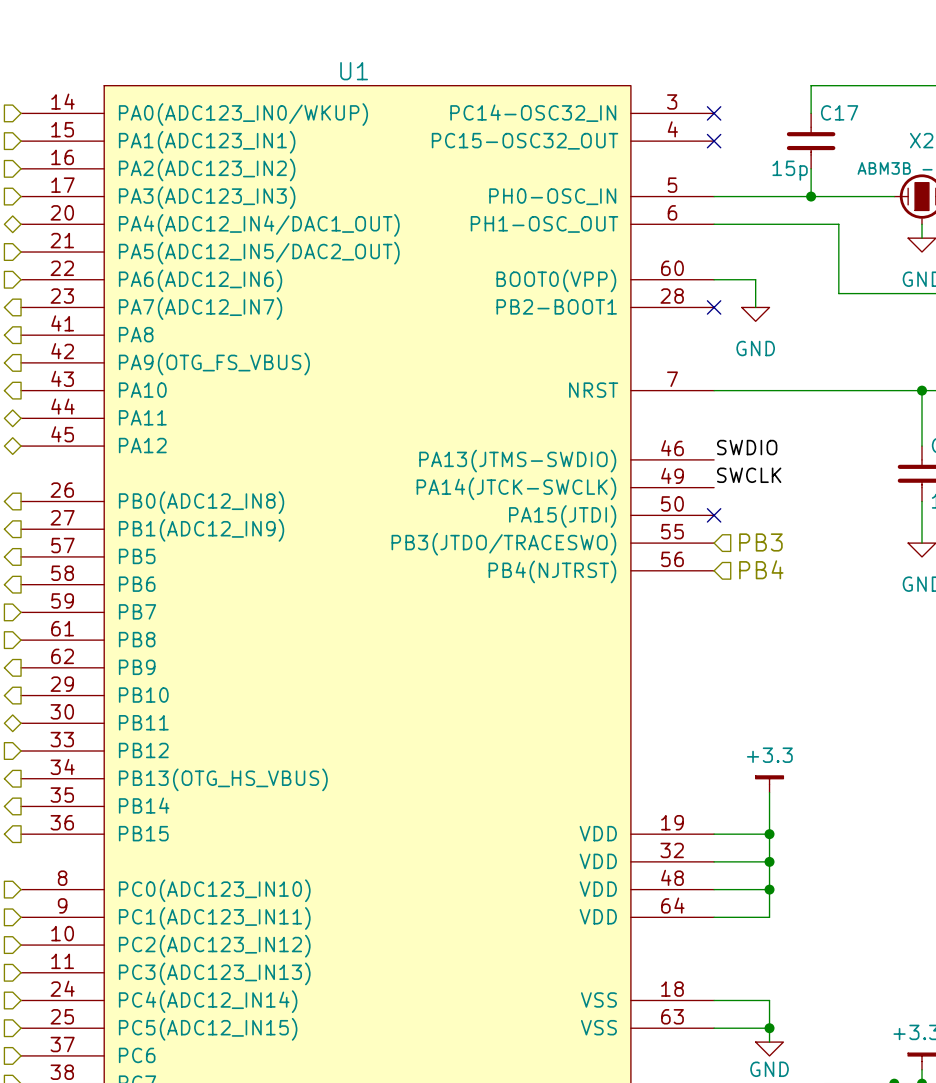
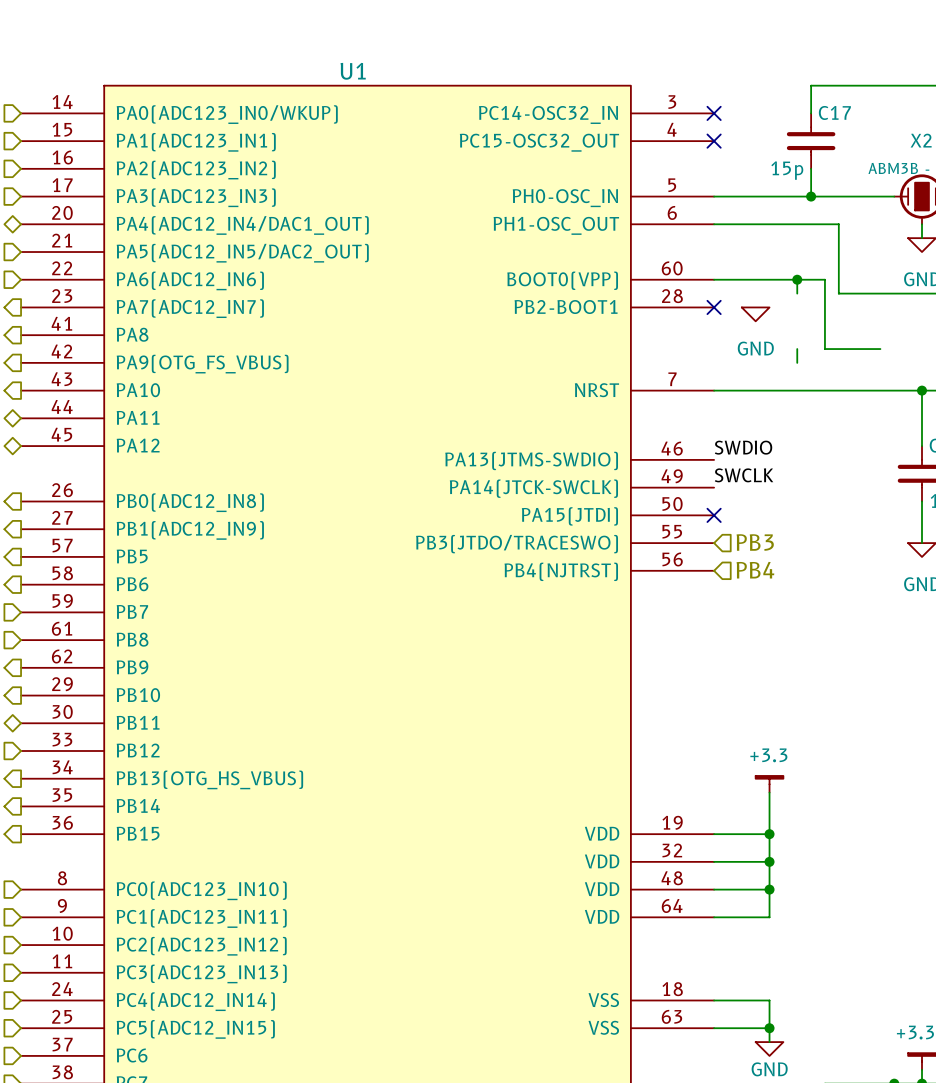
wire: (755, 279) (755, 307) -> (755, 279) (824, 279) (824, 349) (880, 349)
wire: none -> (797, 279) (797, 293)
junction: none -> (797, 279)
wire: none -> (797, 349) (797, 362)

